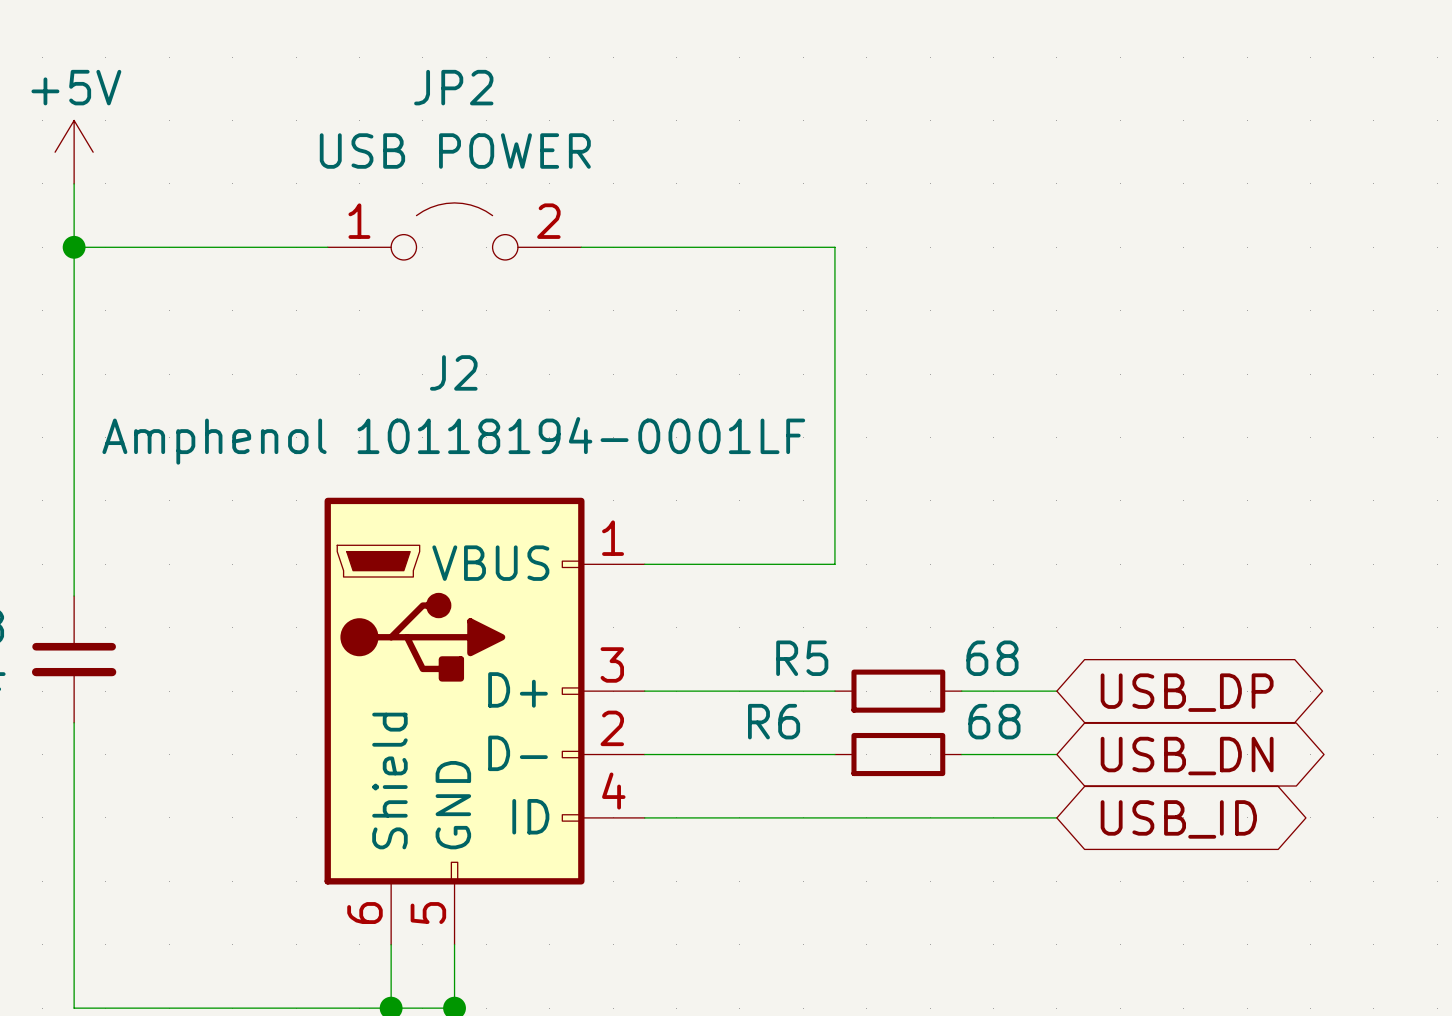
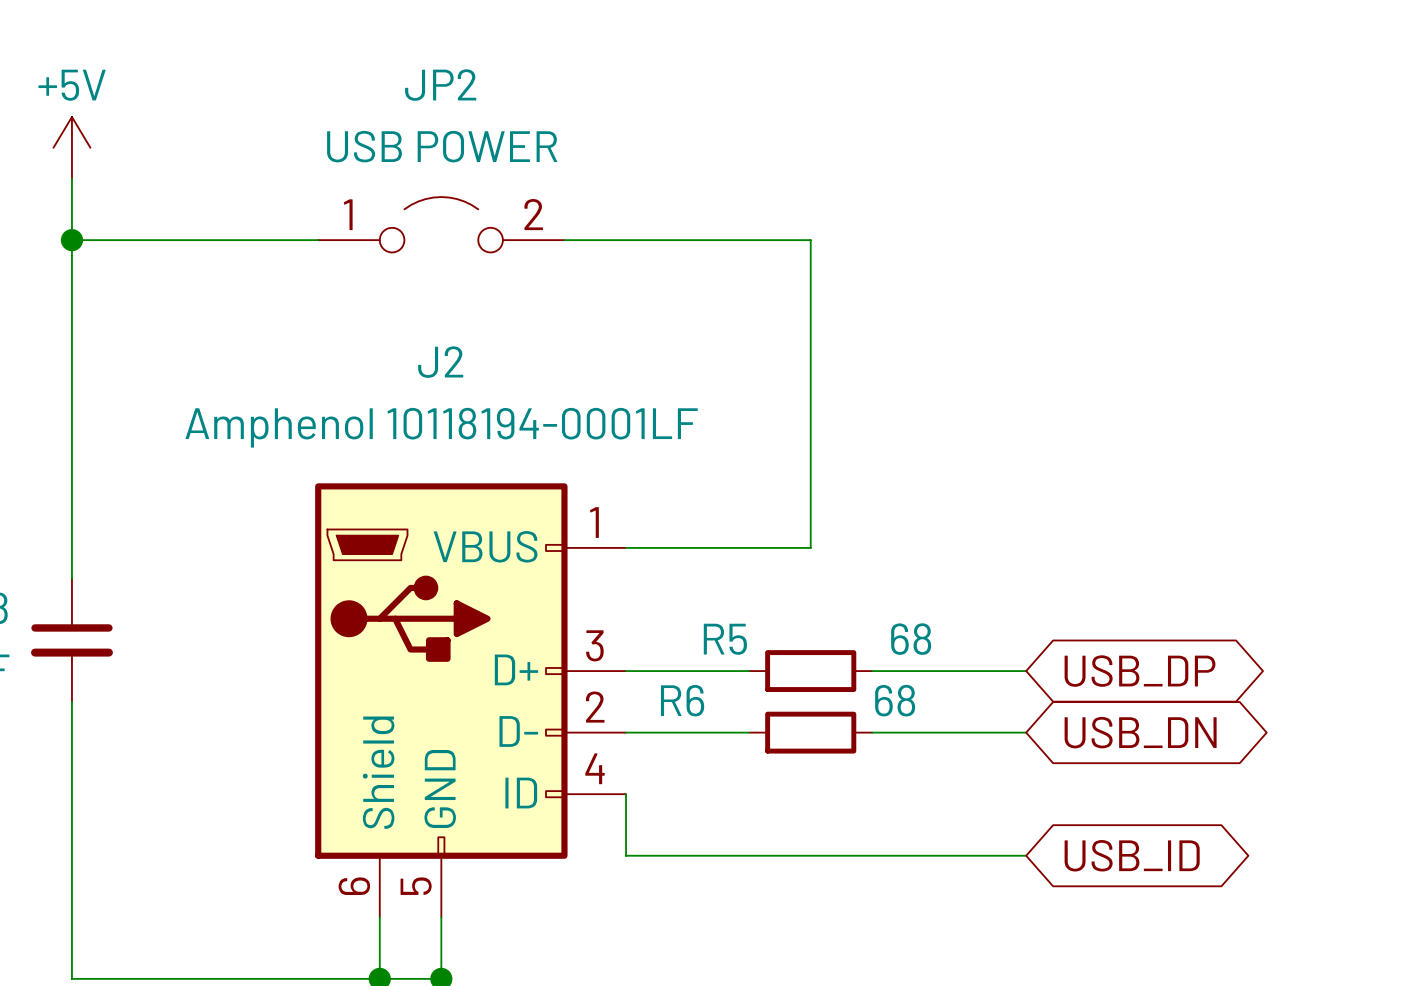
wire: (771, 691) (834, 691) -> (872, 671) (933, 671)
R5 position: (898, 691) -> (810, 671)
wire: (771, 754) (834, 754) -> (872, 732) (933, 732)
R6 position: (898, 754) -> (810, 732)
wire: (644, 817) (1056, 817) -> (626, 794) (626, 855) (1026, 855)
global label position: USB_ID (1178, 819) -> USB_ID (1132, 855)

